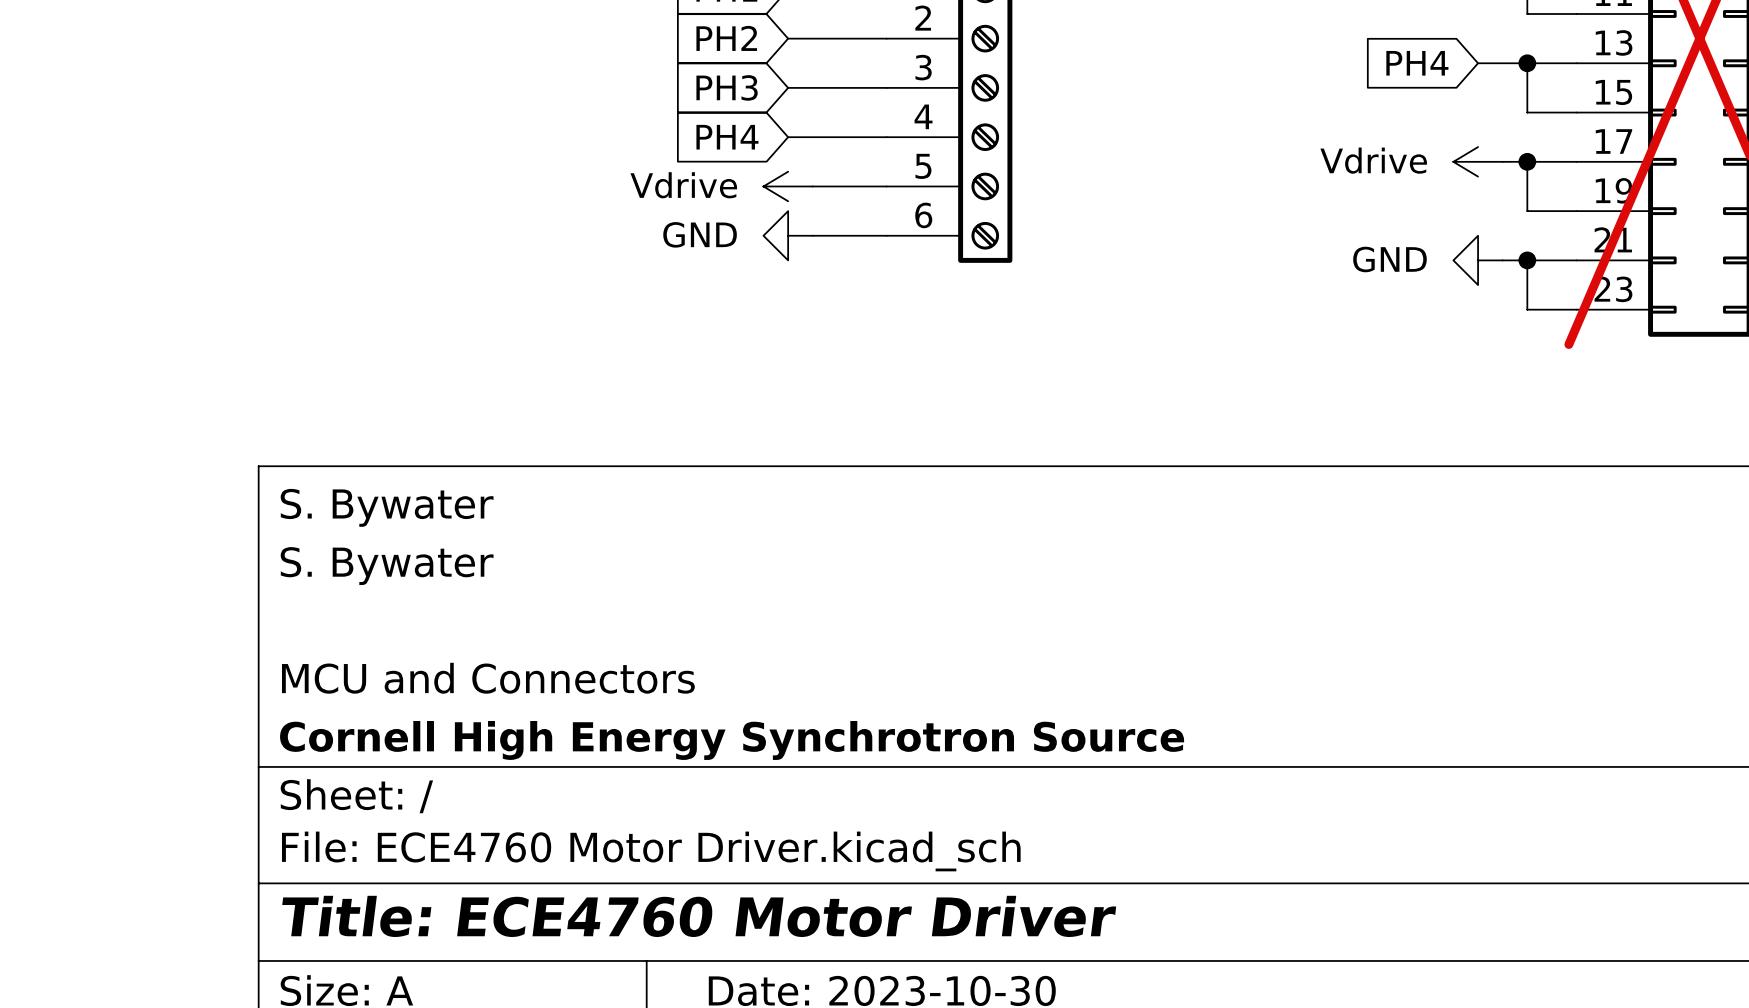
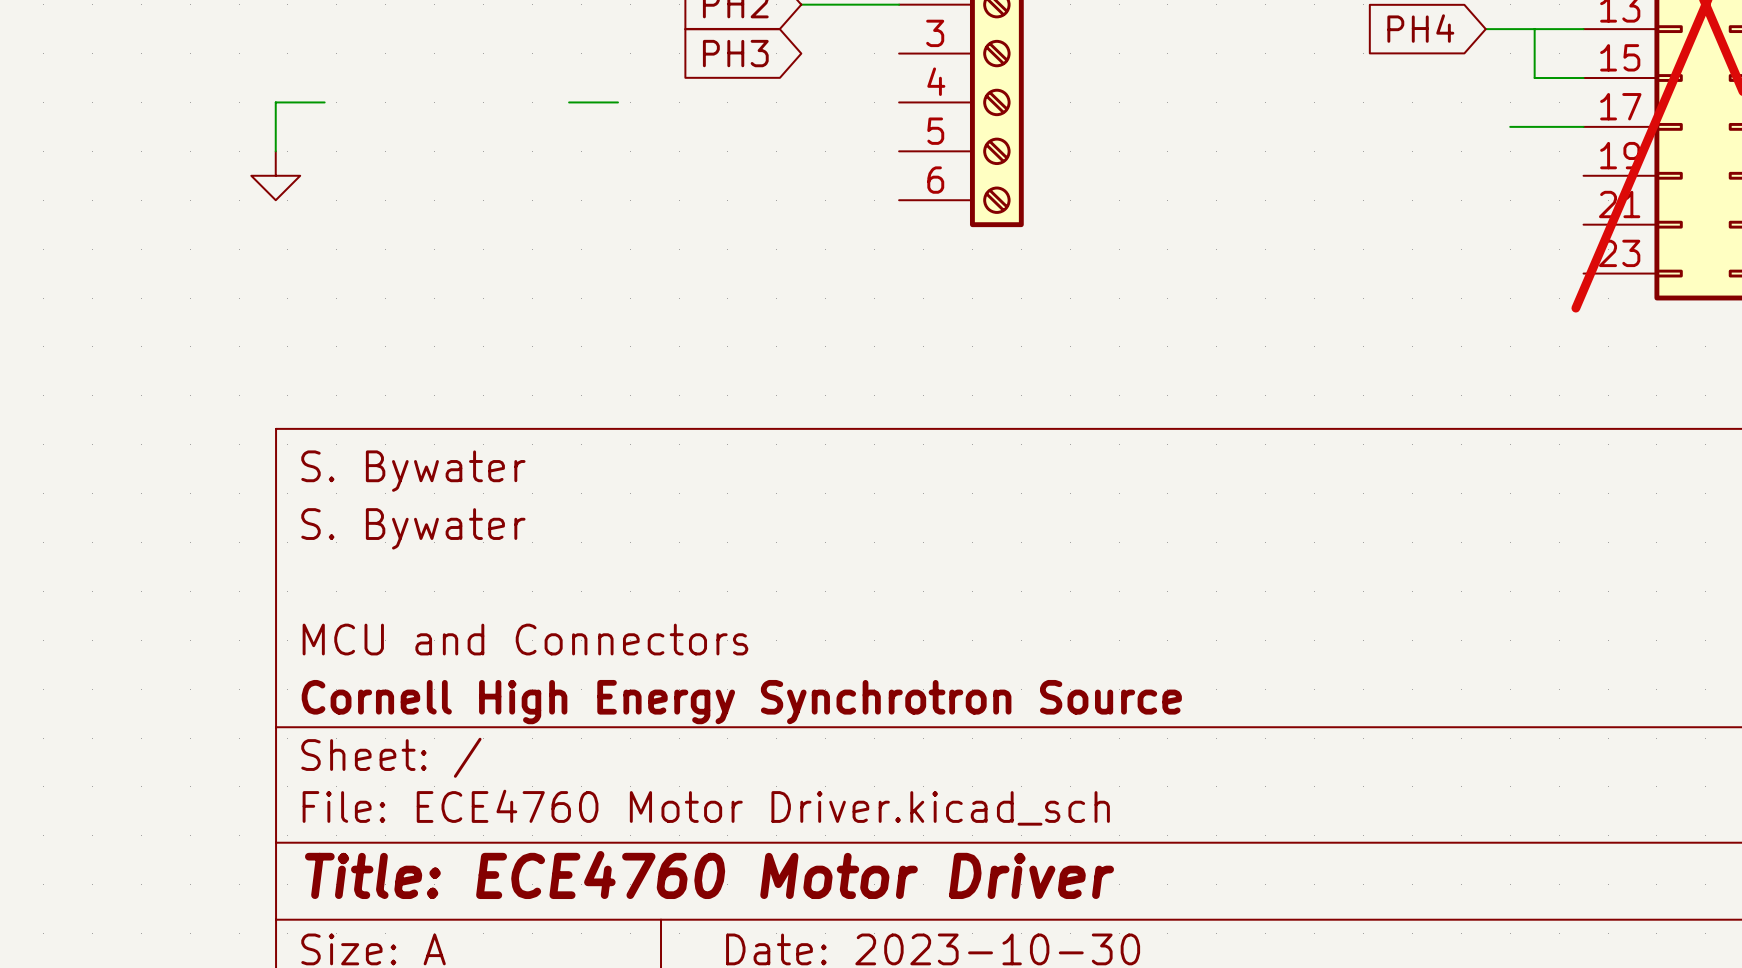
junction: (1527, 63) -> none
wire: (788, 87) (886, 87) -> none
wire: none -> (324, 102) (275, 102) (275, 151)
wire: none -> (569, 102) (617, 102)
global label: PH4 (727, 137) -> none
wire: (788, 137) (886, 137) -> none
power symbol: Vdrive (1478, 161) -> none
wire: (1527, 161) (1527, 211) (1576, 211) -> none
junction: (1527, 161) -> none
power symbol: Vdrive (788, 186) -> none
wire: (812, 186) (886, 186) -> none
power symbol: none -> (275, 175)
power symbol: GND (788, 235) -> none
wire: (812, 235) (886, 235) -> none
power symbol: GND (1478, 260) -> none
wire: (1502, 260) (1576, 260) -> none
wire: (1527, 260) (1527, 309) (1576, 309) -> none
junction: (1527, 260) -> none

